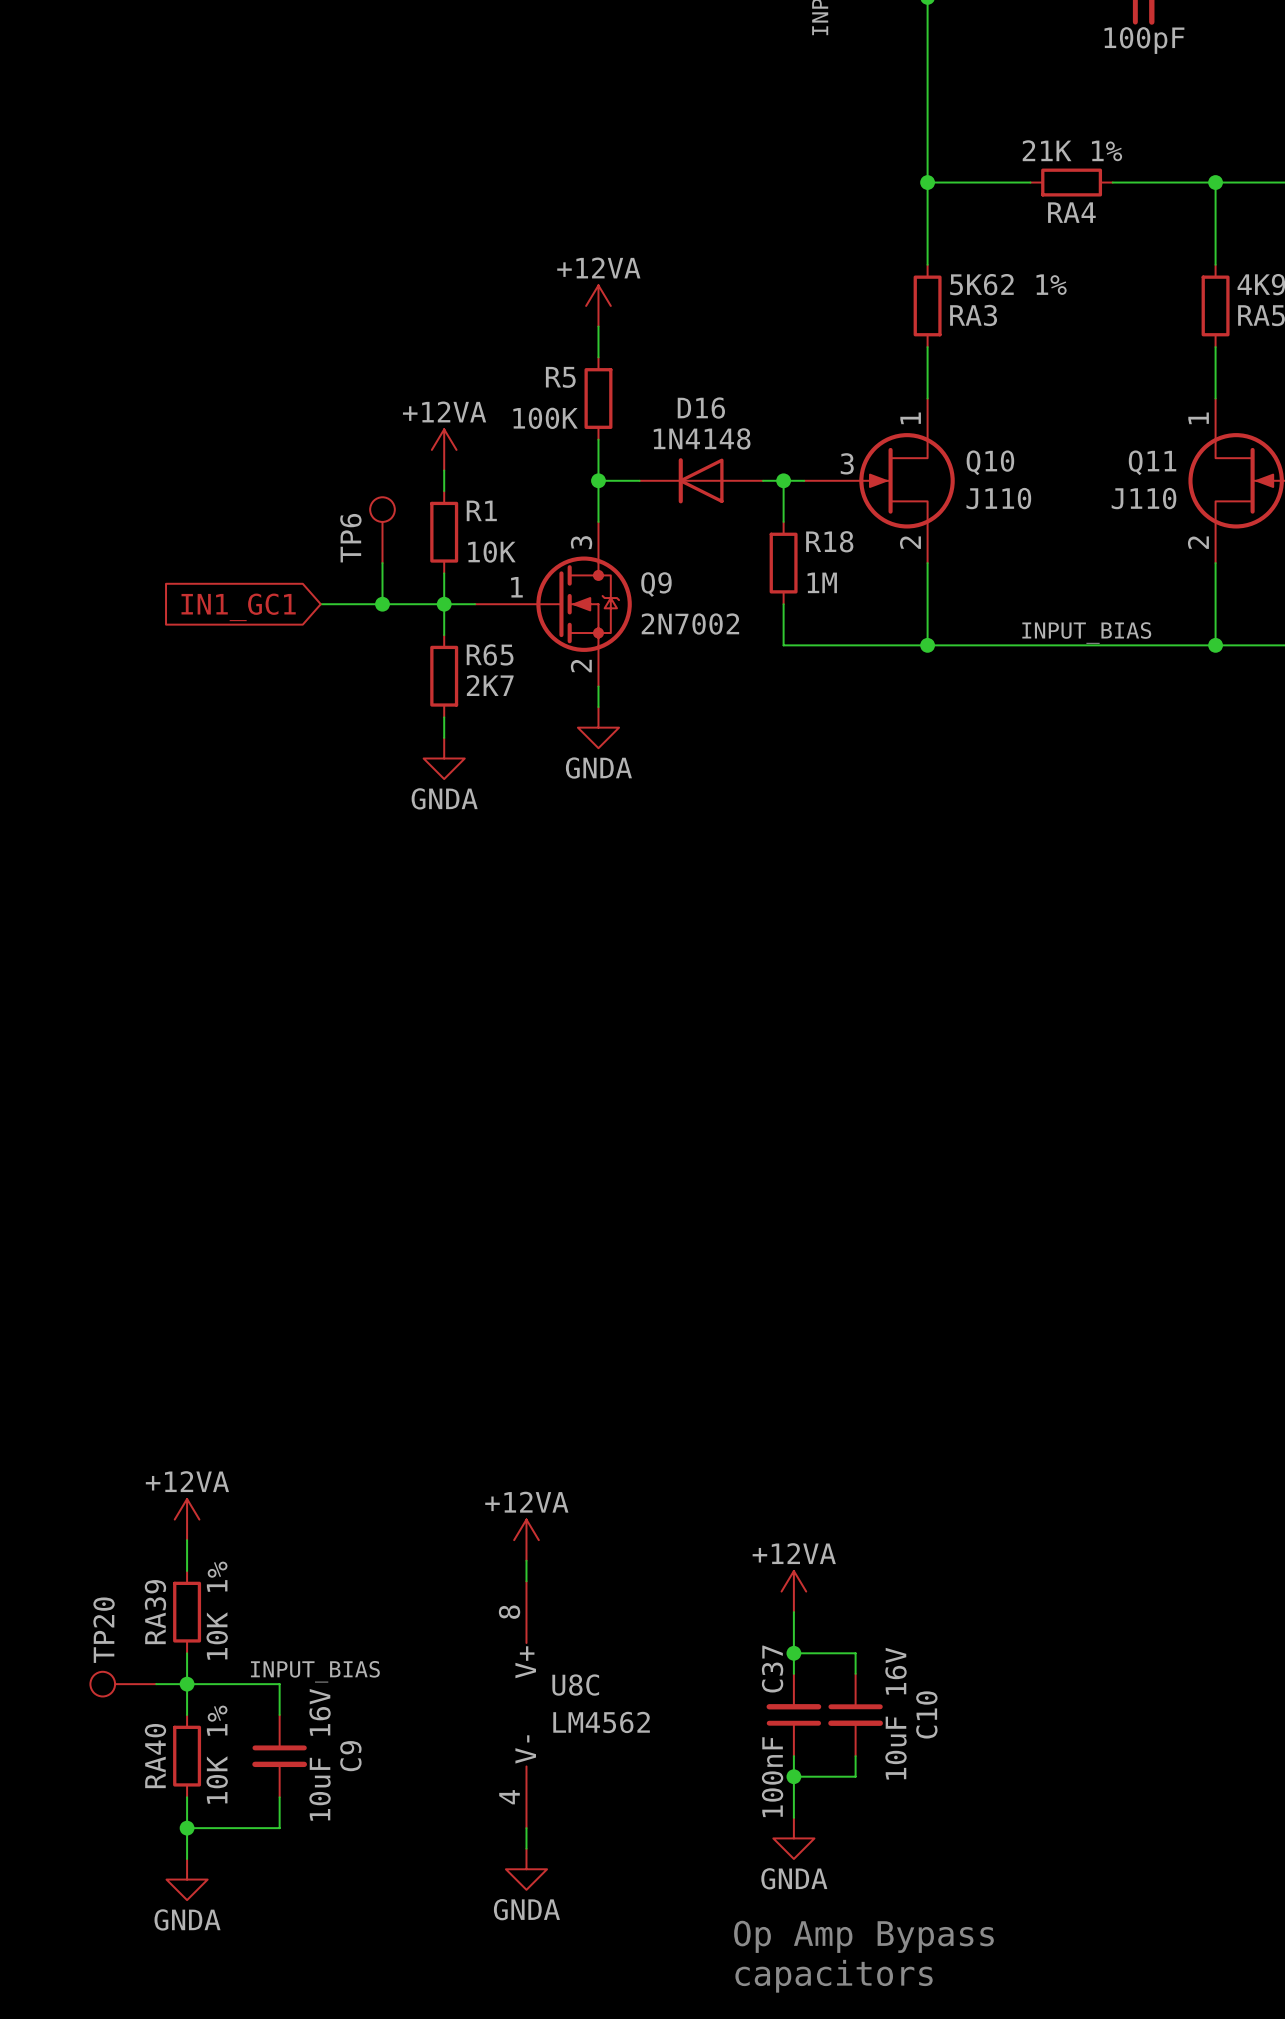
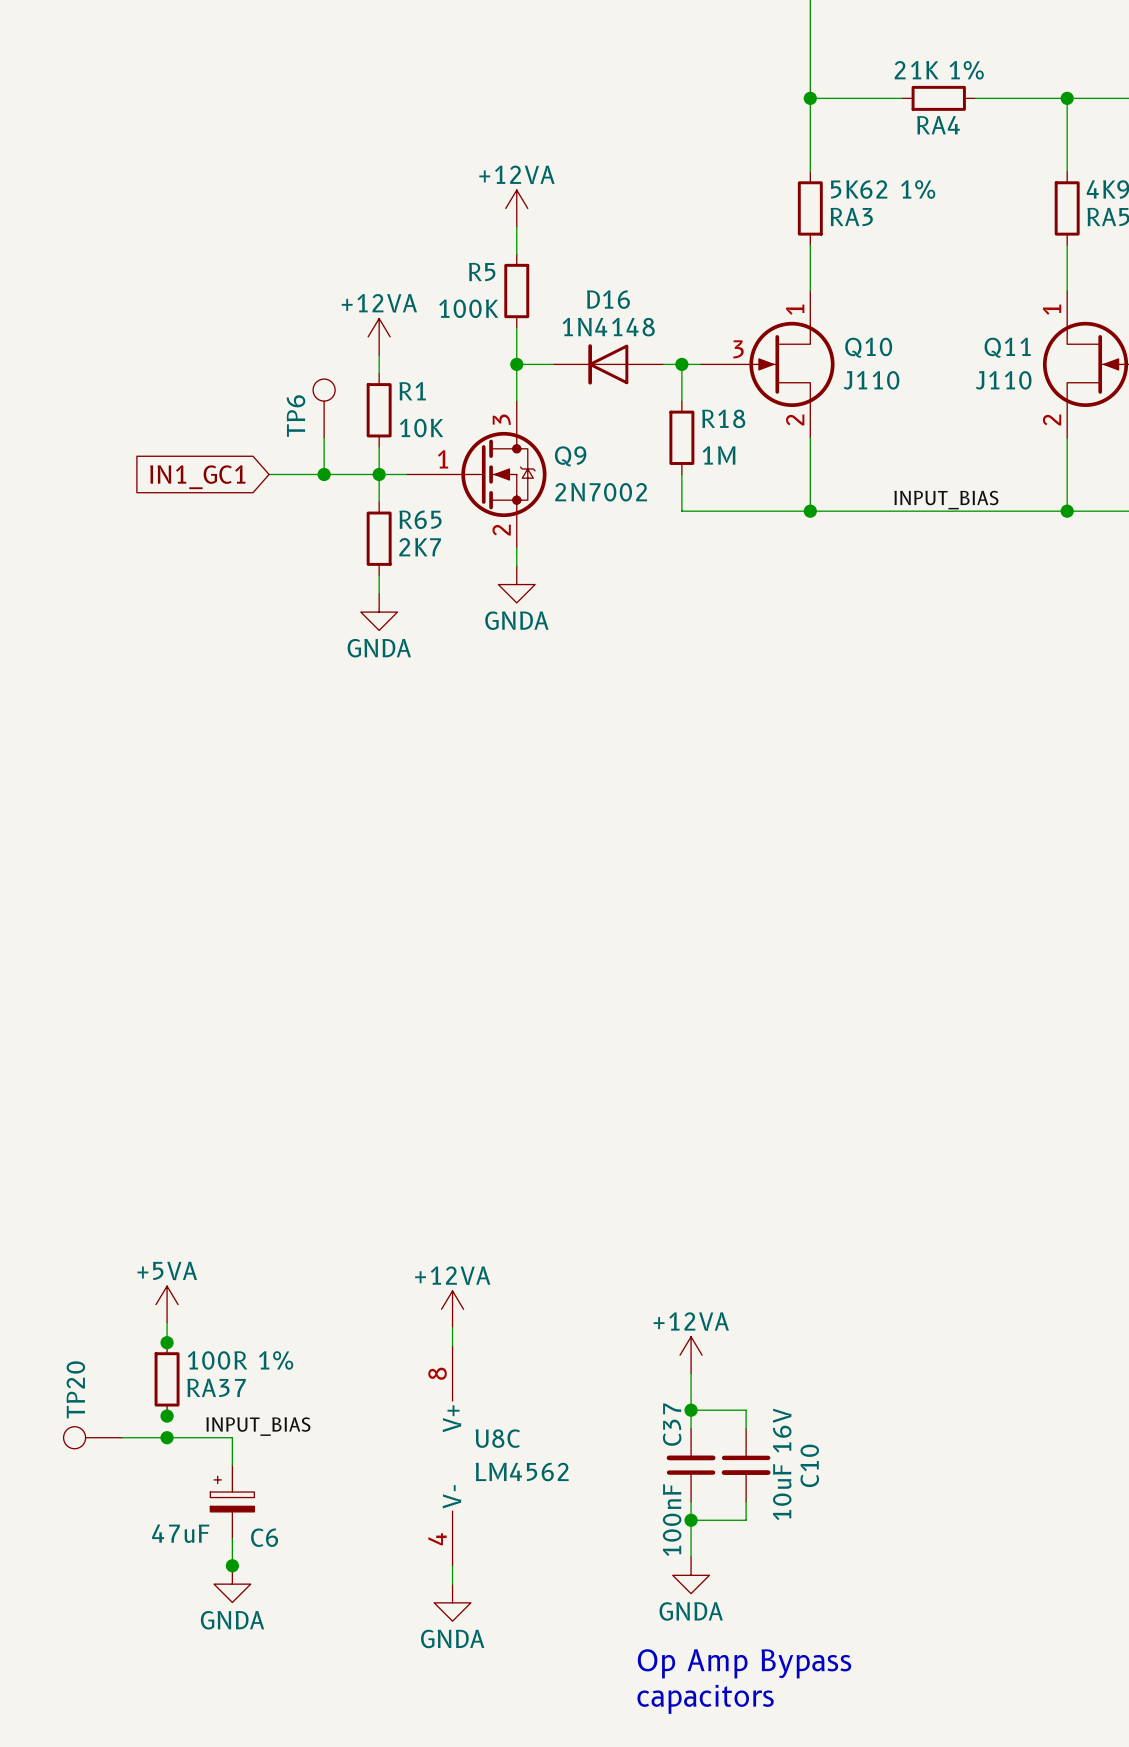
power symbol: +12VA (187, 1519) -> none
power symbol: none -> +5VA (167, 1304)
wire: (187, 1540) (187, 1571) -> none
wire: none -> (167, 1322) (167, 1343)
junction: none -> (167, 1342)
RA39: 10K 1% (187, 1612) -> none
RA37: none -> 100R 1% (167, 1379)
wire: (187, 1653) (187, 1715) -> none
junction: none -> (167, 1416)
junction: (187, 1684) -> none
junction: none -> (167, 1437)
RA40: 10K 1% (187, 1756) -> none
C9: 10uF 16V (279, 1756) -> none
C6: none -> 47uF (232, 1501)
wire: (187, 1797) (187, 1858) -> none
junction: none -> (232, 1565)
wire: (187, 1828) (279, 1828) -> none
junction: (187, 1828) -> none
power symbol position: GNDA (187, 1879) -> GNDA (232, 1584)

